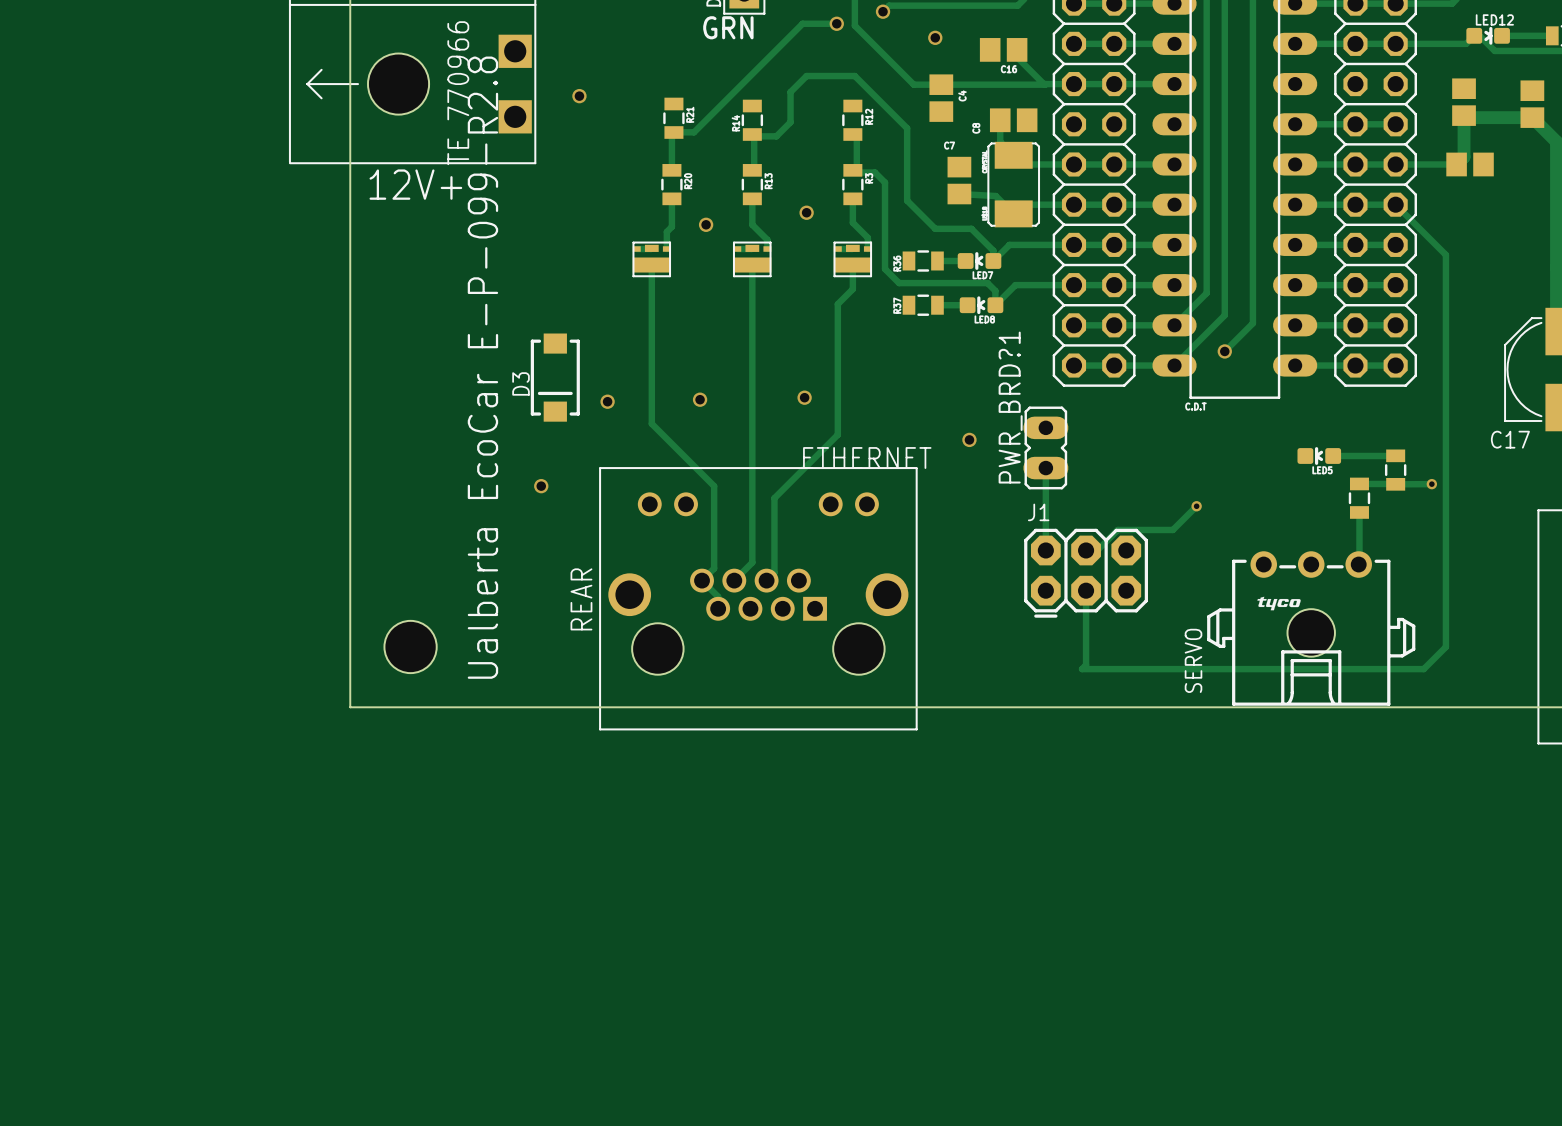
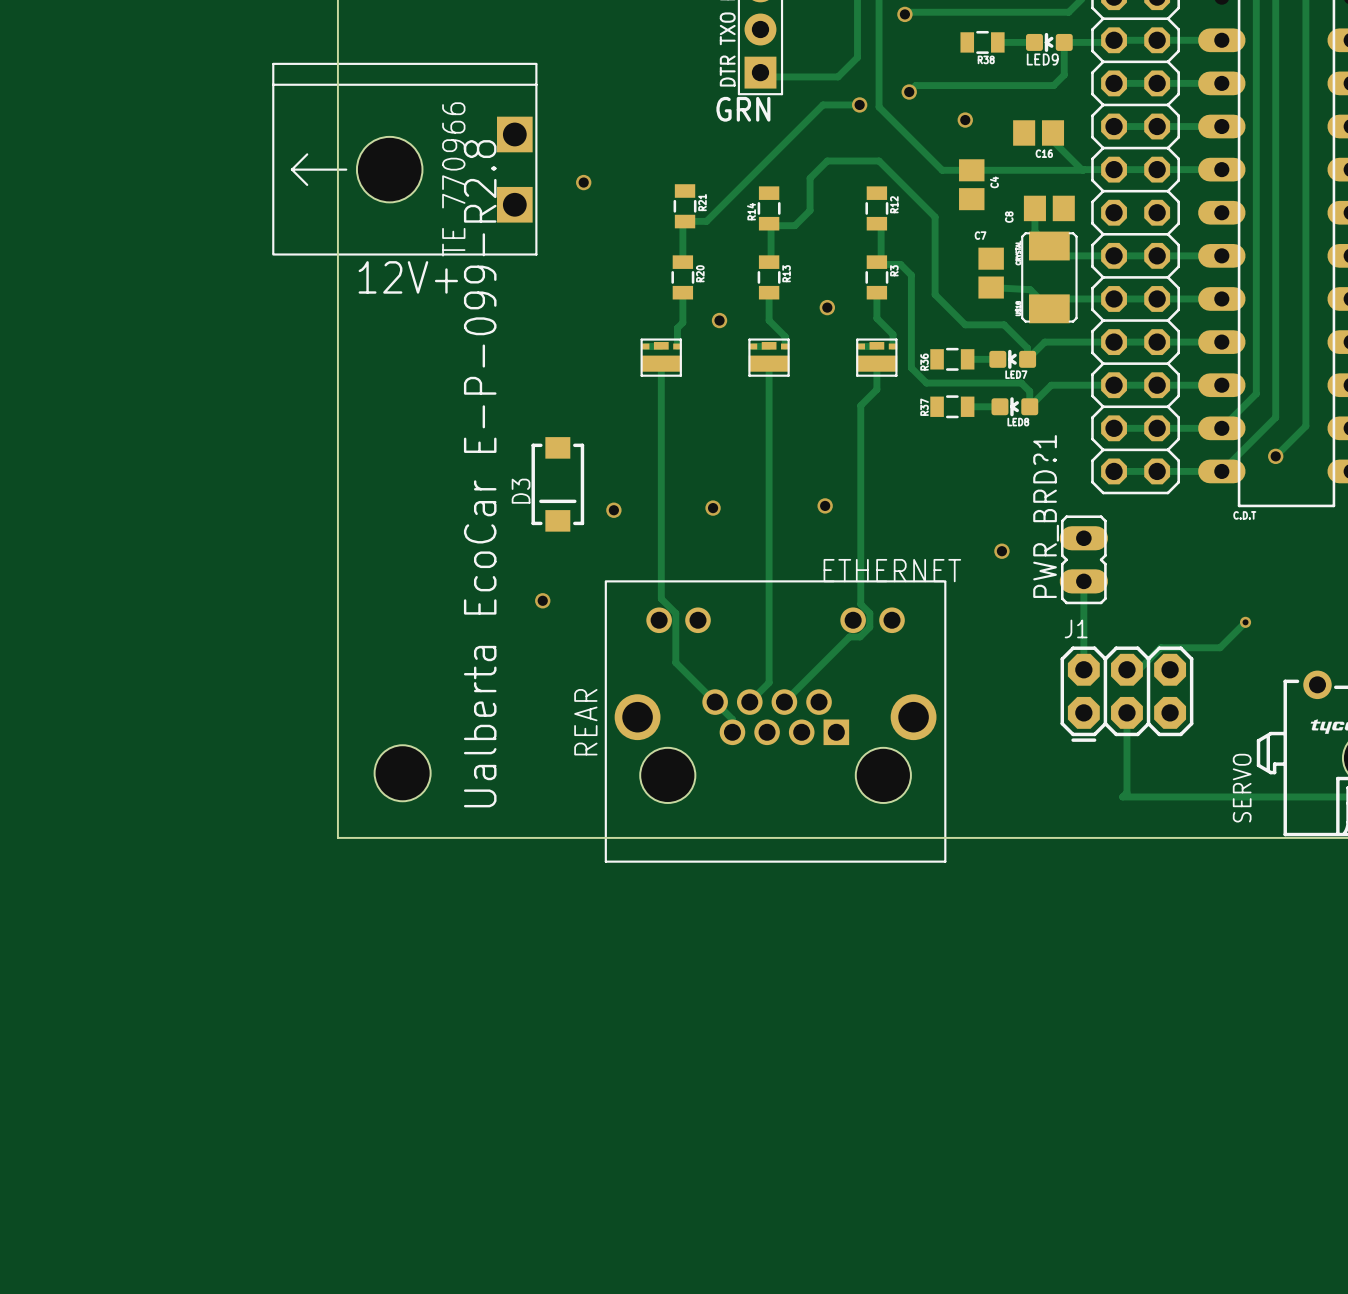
track: (651, 423) (714, 486) (714, 568) (702, 580) -> (661, 533) (661, 598) (675, 613) (675, 662) (719, 706)
track: (837, 434) (774, 498) (774, 572) -> (860, 545) (860, 604) (869, 613) (869, 627) (860, 636) (849, 636) (792, 693)

